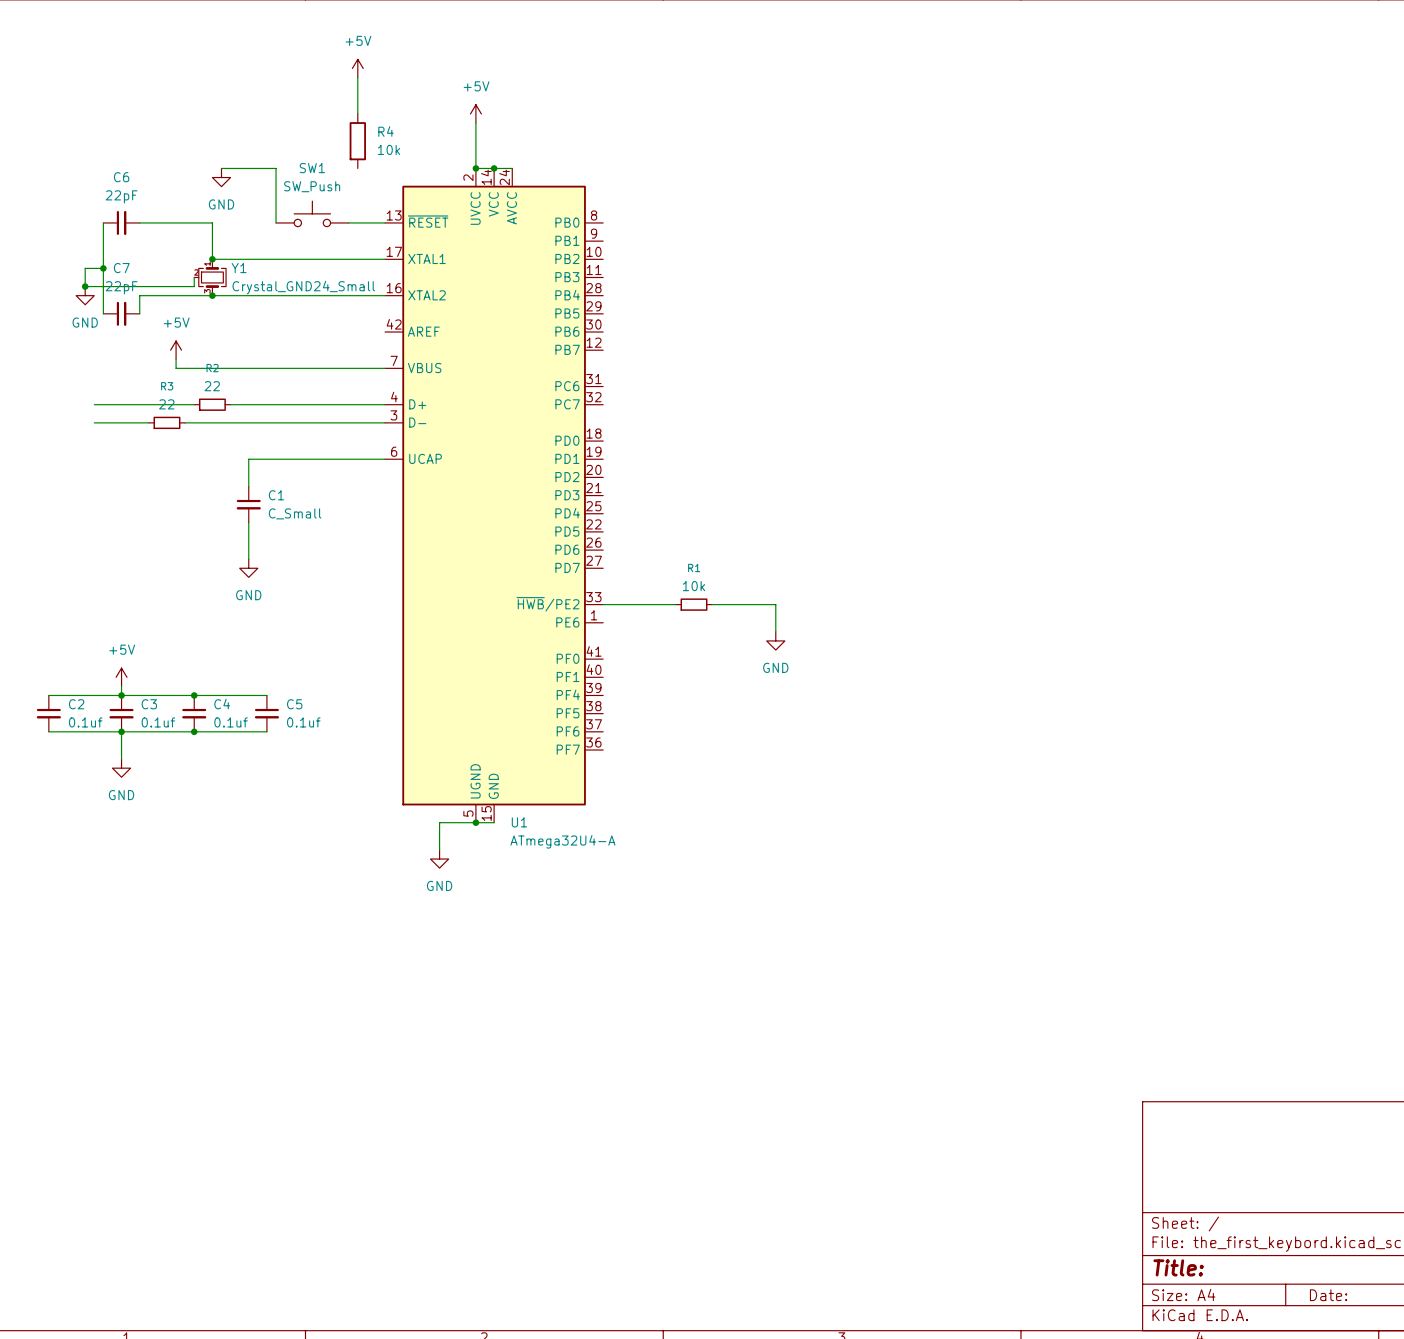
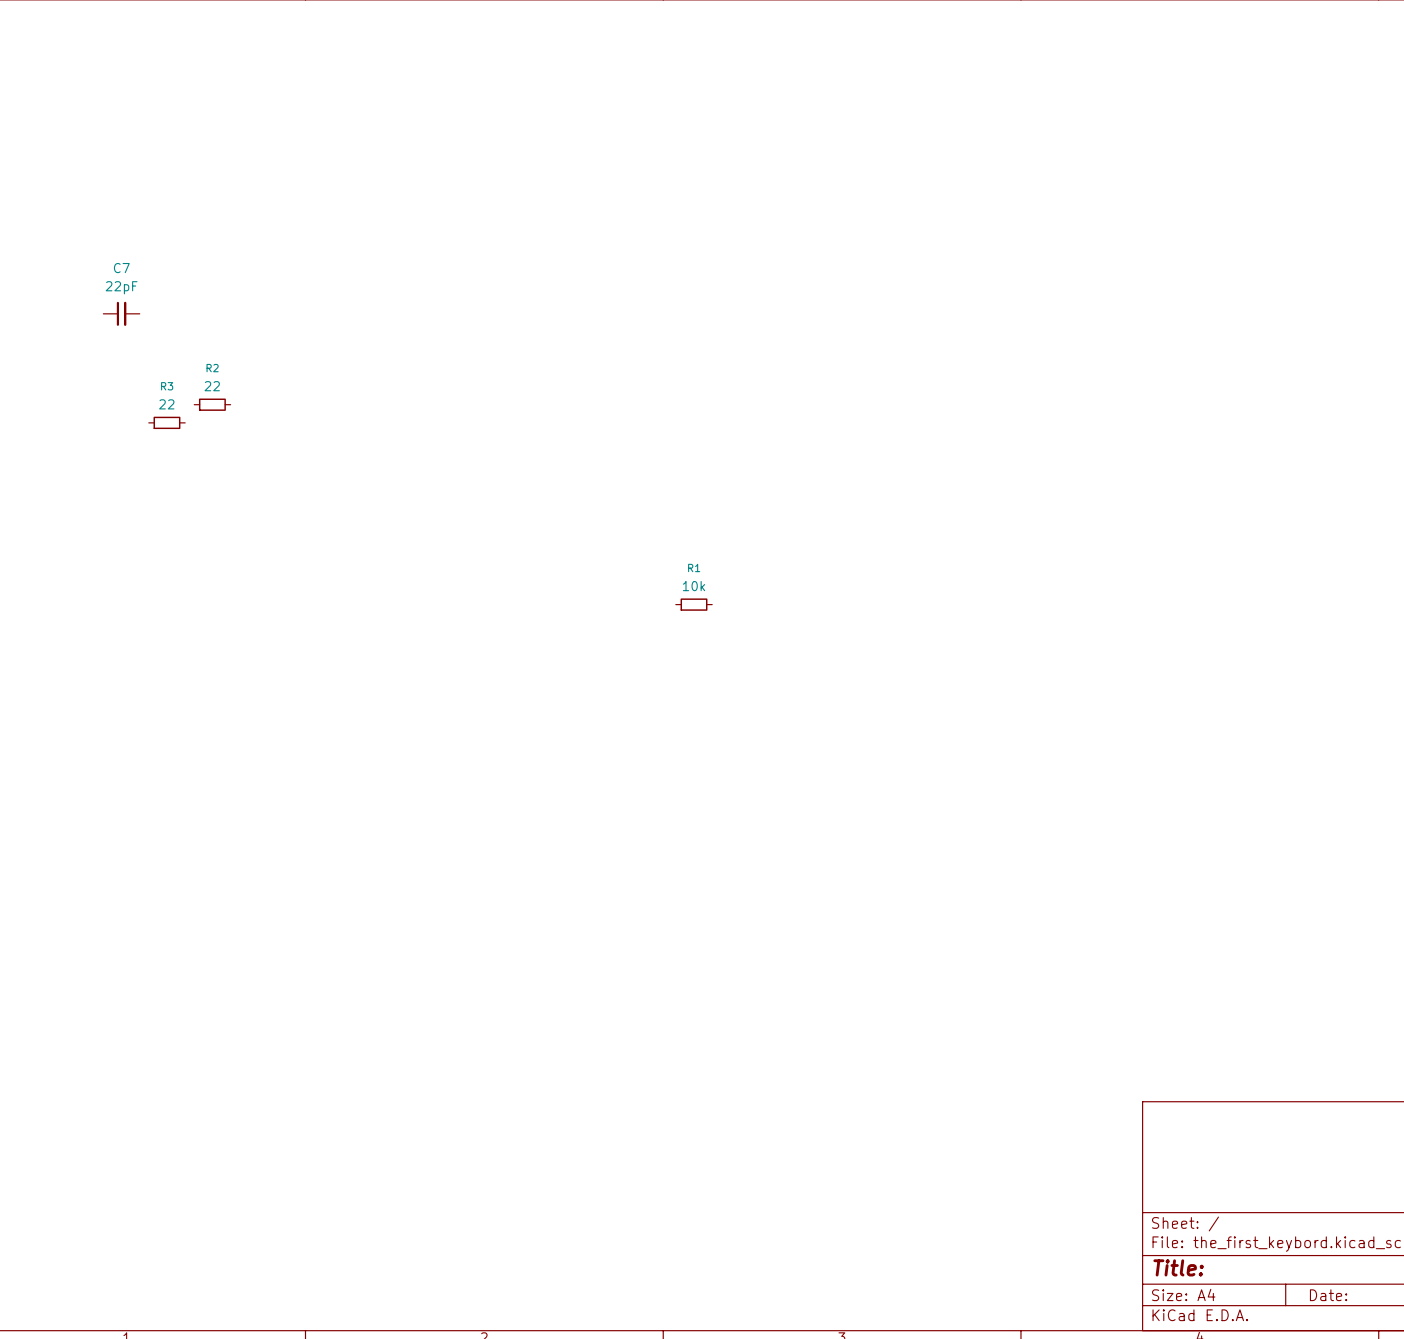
power symbol: +5V (357, 68) -> none
wire: (357, 77) (357, 113) -> none
power symbol: +5V (475, 113) -> none
wire: (475, 123) (475, 168) (512, 168) -> none
R4: 10k (357, 141) -> none
wire: (221, 168) (276, 168) (276, 222) -> none
junction: (475, 168) -> none
junction: (494, 168) -> none
power symbol: GND (221, 177) -> none
SW1: SW_Push (312, 213) -> none
wire: (103, 222) (103, 313) -> none
C6: 22pF (121, 222) -> none
wire: (139, 222) (212, 222) (212, 259) (385, 259) -> none
wire: (348, 222) (385, 222) -> none
junction: (212, 259) -> none
wire: (103, 268) (85, 268) (85, 286) (194, 286) (194, 277) -> none
junction: (103, 268) -> none
Y1: Crystal_GND24_Small (210, 277) -> none
junction: (85, 286) -> none
power symbol: GND (85, 295) -> none
junction: (212, 295) -> none
wire: (385, 295) (139, 295) (139, 313) -> none
power symbol: +5V (176, 350) -> none
wire: (176, 359) (176, 368) (385, 368) -> none
wire: (94, 404) (194, 404) -> none
wire: (230, 404) (385, 404) -> none
wire: (94, 422) (148, 422) -> none
wire: (185, 422) (385, 422) -> none
wire: (385, 459) (248, 459) (248, 486) -> none
U1: ATmega32U4-A (494, 495) -> none
C1: C_Small (248, 504) -> none
wire: (248, 522) (248, 559) -> none
power symbol: GND (248, 568) -> none
wire: (603, 604) (675, 604) -> none
wire: (712, 604) (775, 604) (775, 631) -> none
power symbol: GND (775, 640) -> none
power symbol: +5V (121, 677) -> none
wire: (121, 686) (121, 695) -> none
wire: (48, 695) (266, 695) -> none
junction: (121, 695) -> none
junction: (194, 695) -> none
C2: 0.1uf (48, 713) -> none
C3: 0.1uf (121, 713) -> none
C4: 0.1uf (194, 713) -> none
C5: 0.1uf (266, 713) -> none
wire: (48, 731) (266, 731) -> none
wire: (121, 731) (121, 759) -> none
junction: (121, 731) -> none
junction: (194, 731) -> none
power symbol: GND (121, 768) -> none
junction: (475, 822) -> none
wire: (494, 822) (439, 822) (439, 849) -> none
power symbol: GND (439, 859) -> none

